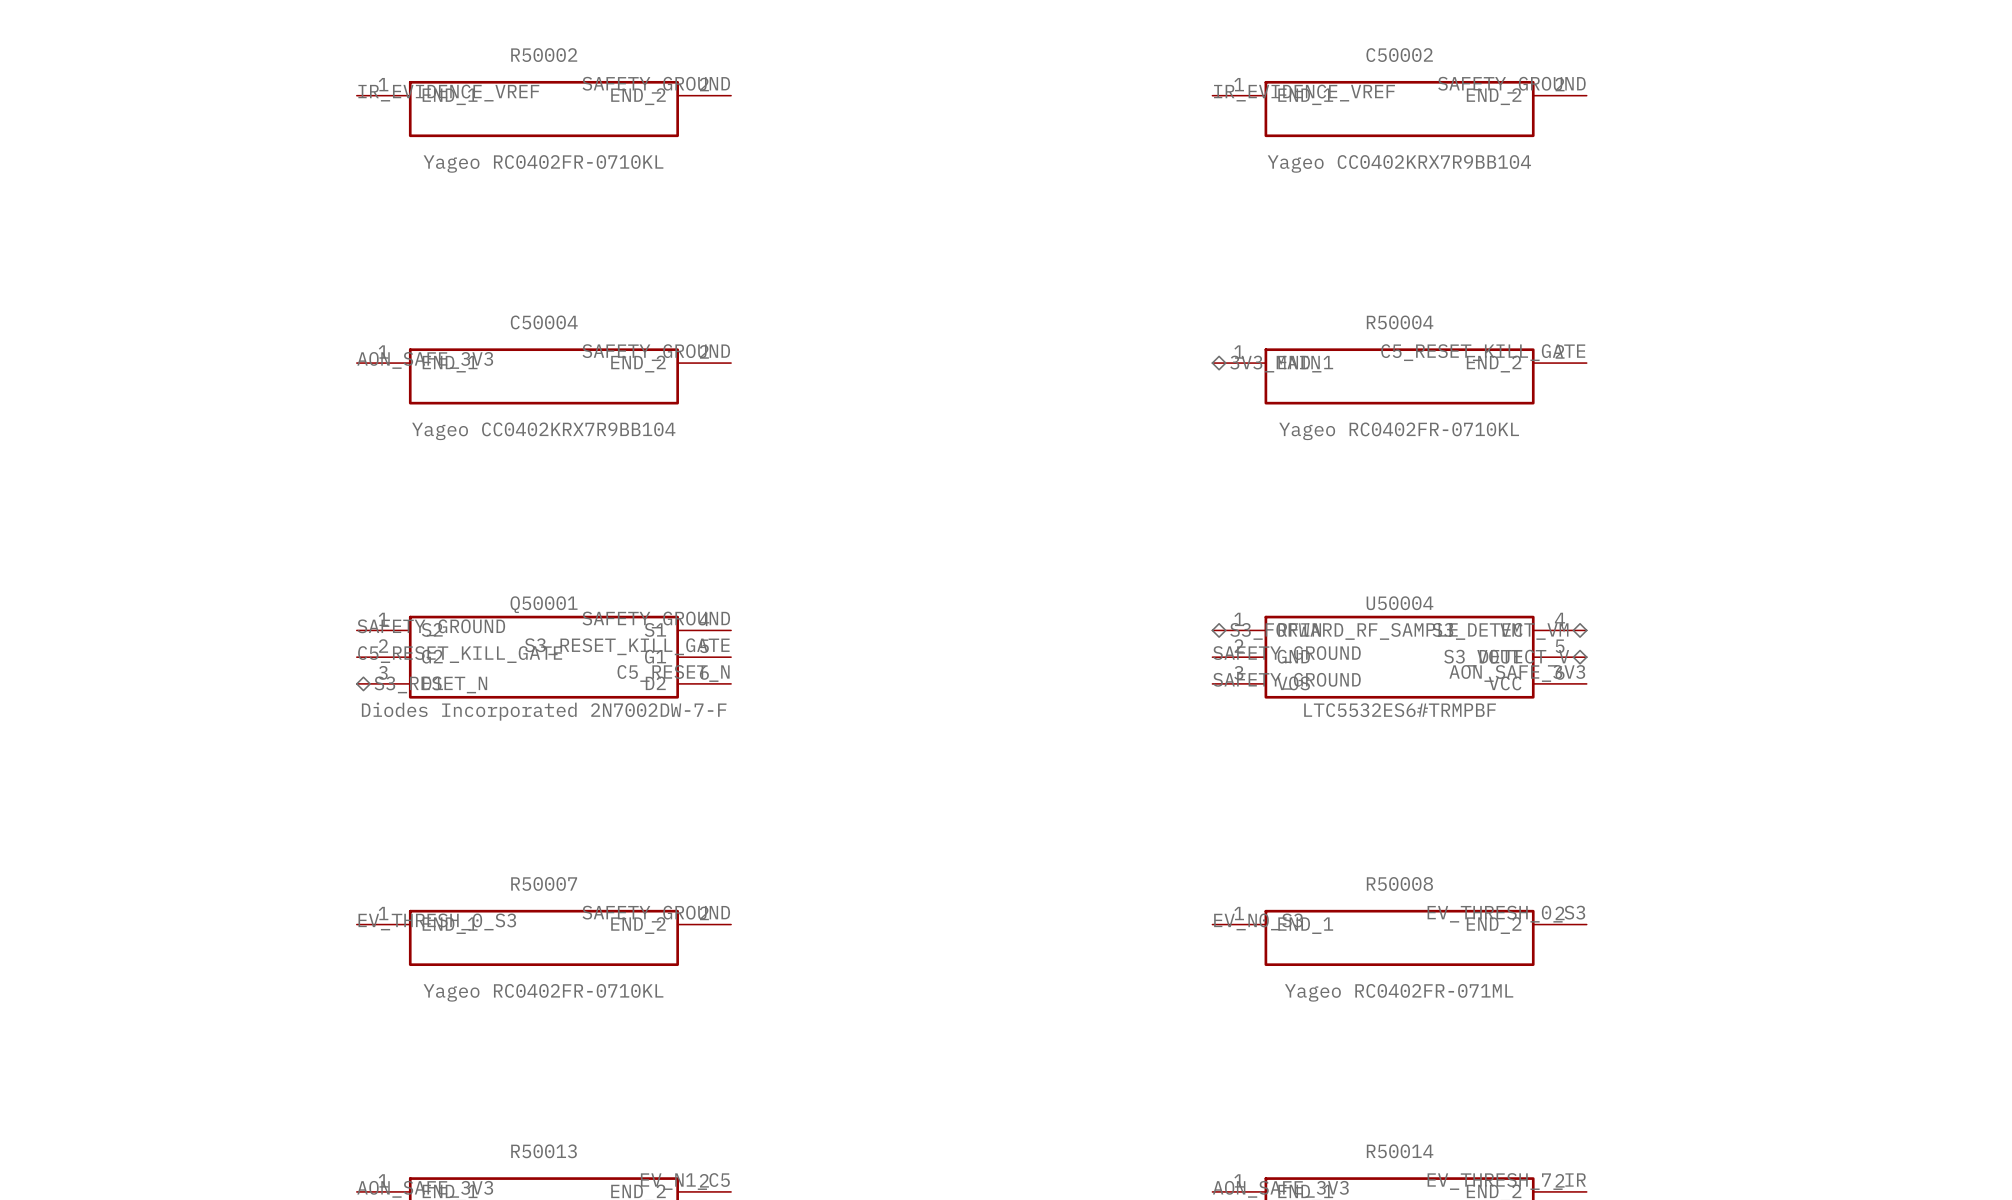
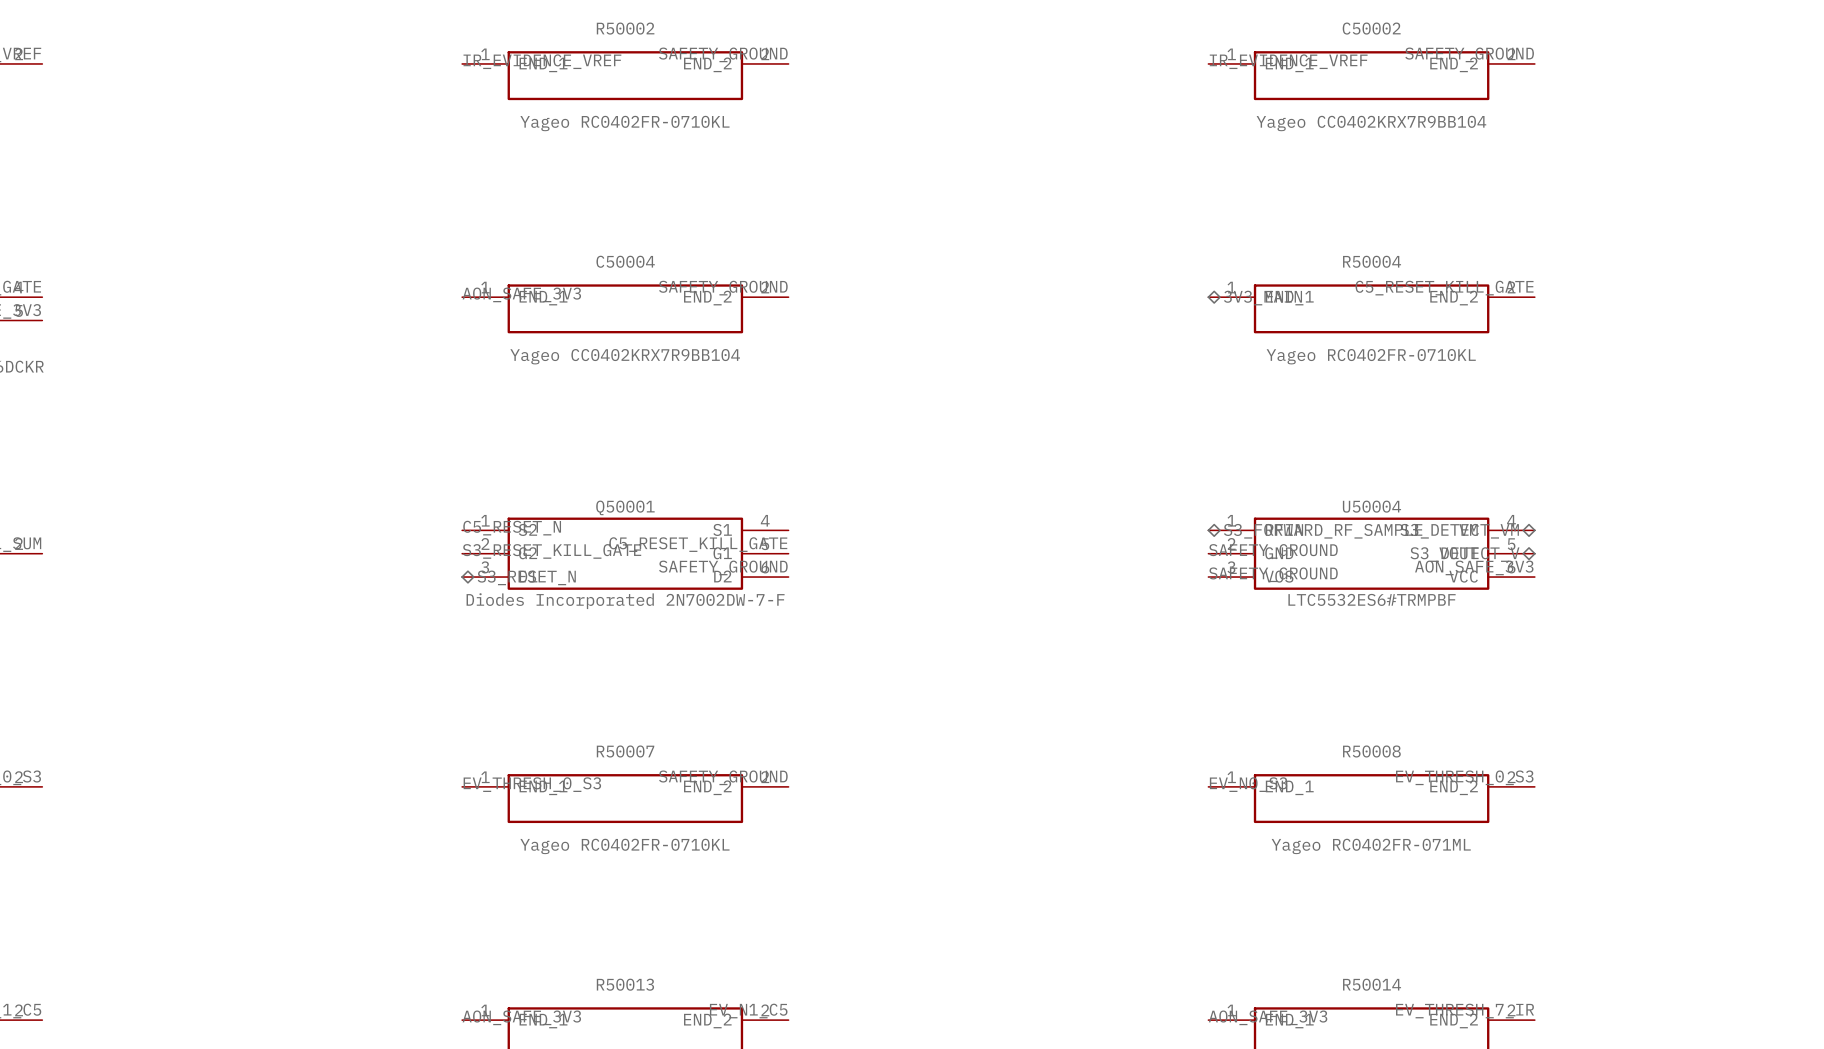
label: SAFETY_GROUND (656, 620) -> none
label: SAFETY_GROUND (431, 627) -> C5_RESET_N (512, 528)
label: S3_RESET_KILL_GATE (627, 646) -> C5_RESET_KILL_GATE (698, 544)
label: C5_RESET_KILL_GATE (460, 654) -> S3_RESET_KILL_GATE (552, 551)
label: C5_RESET_N (673, 673) -> SAFETY_GROUND (723, 567)

